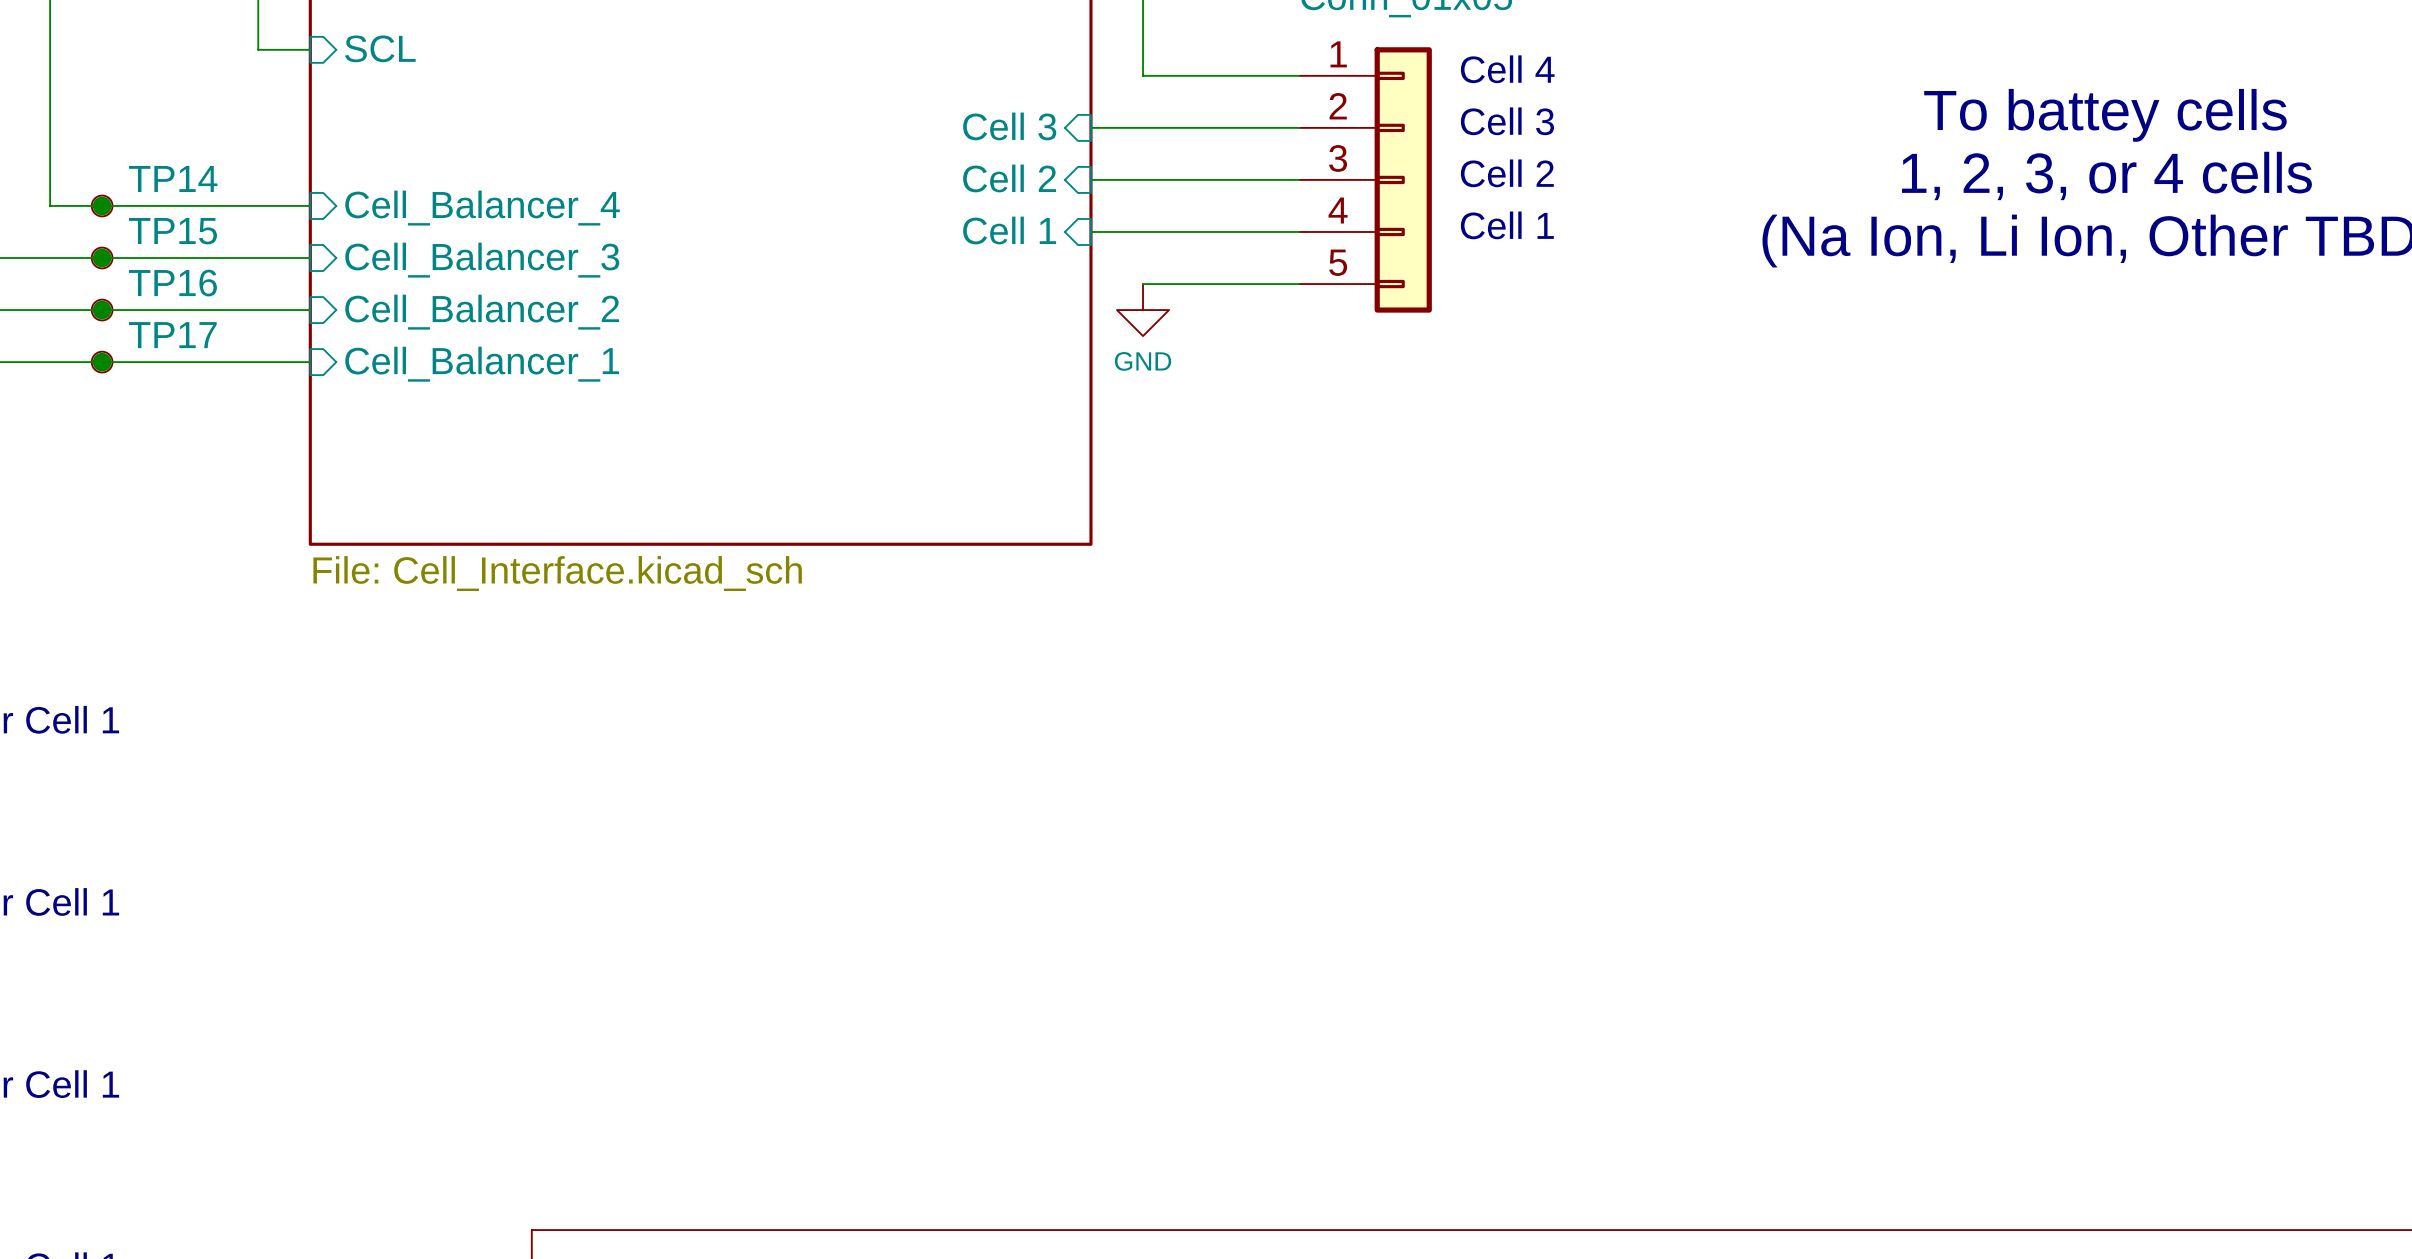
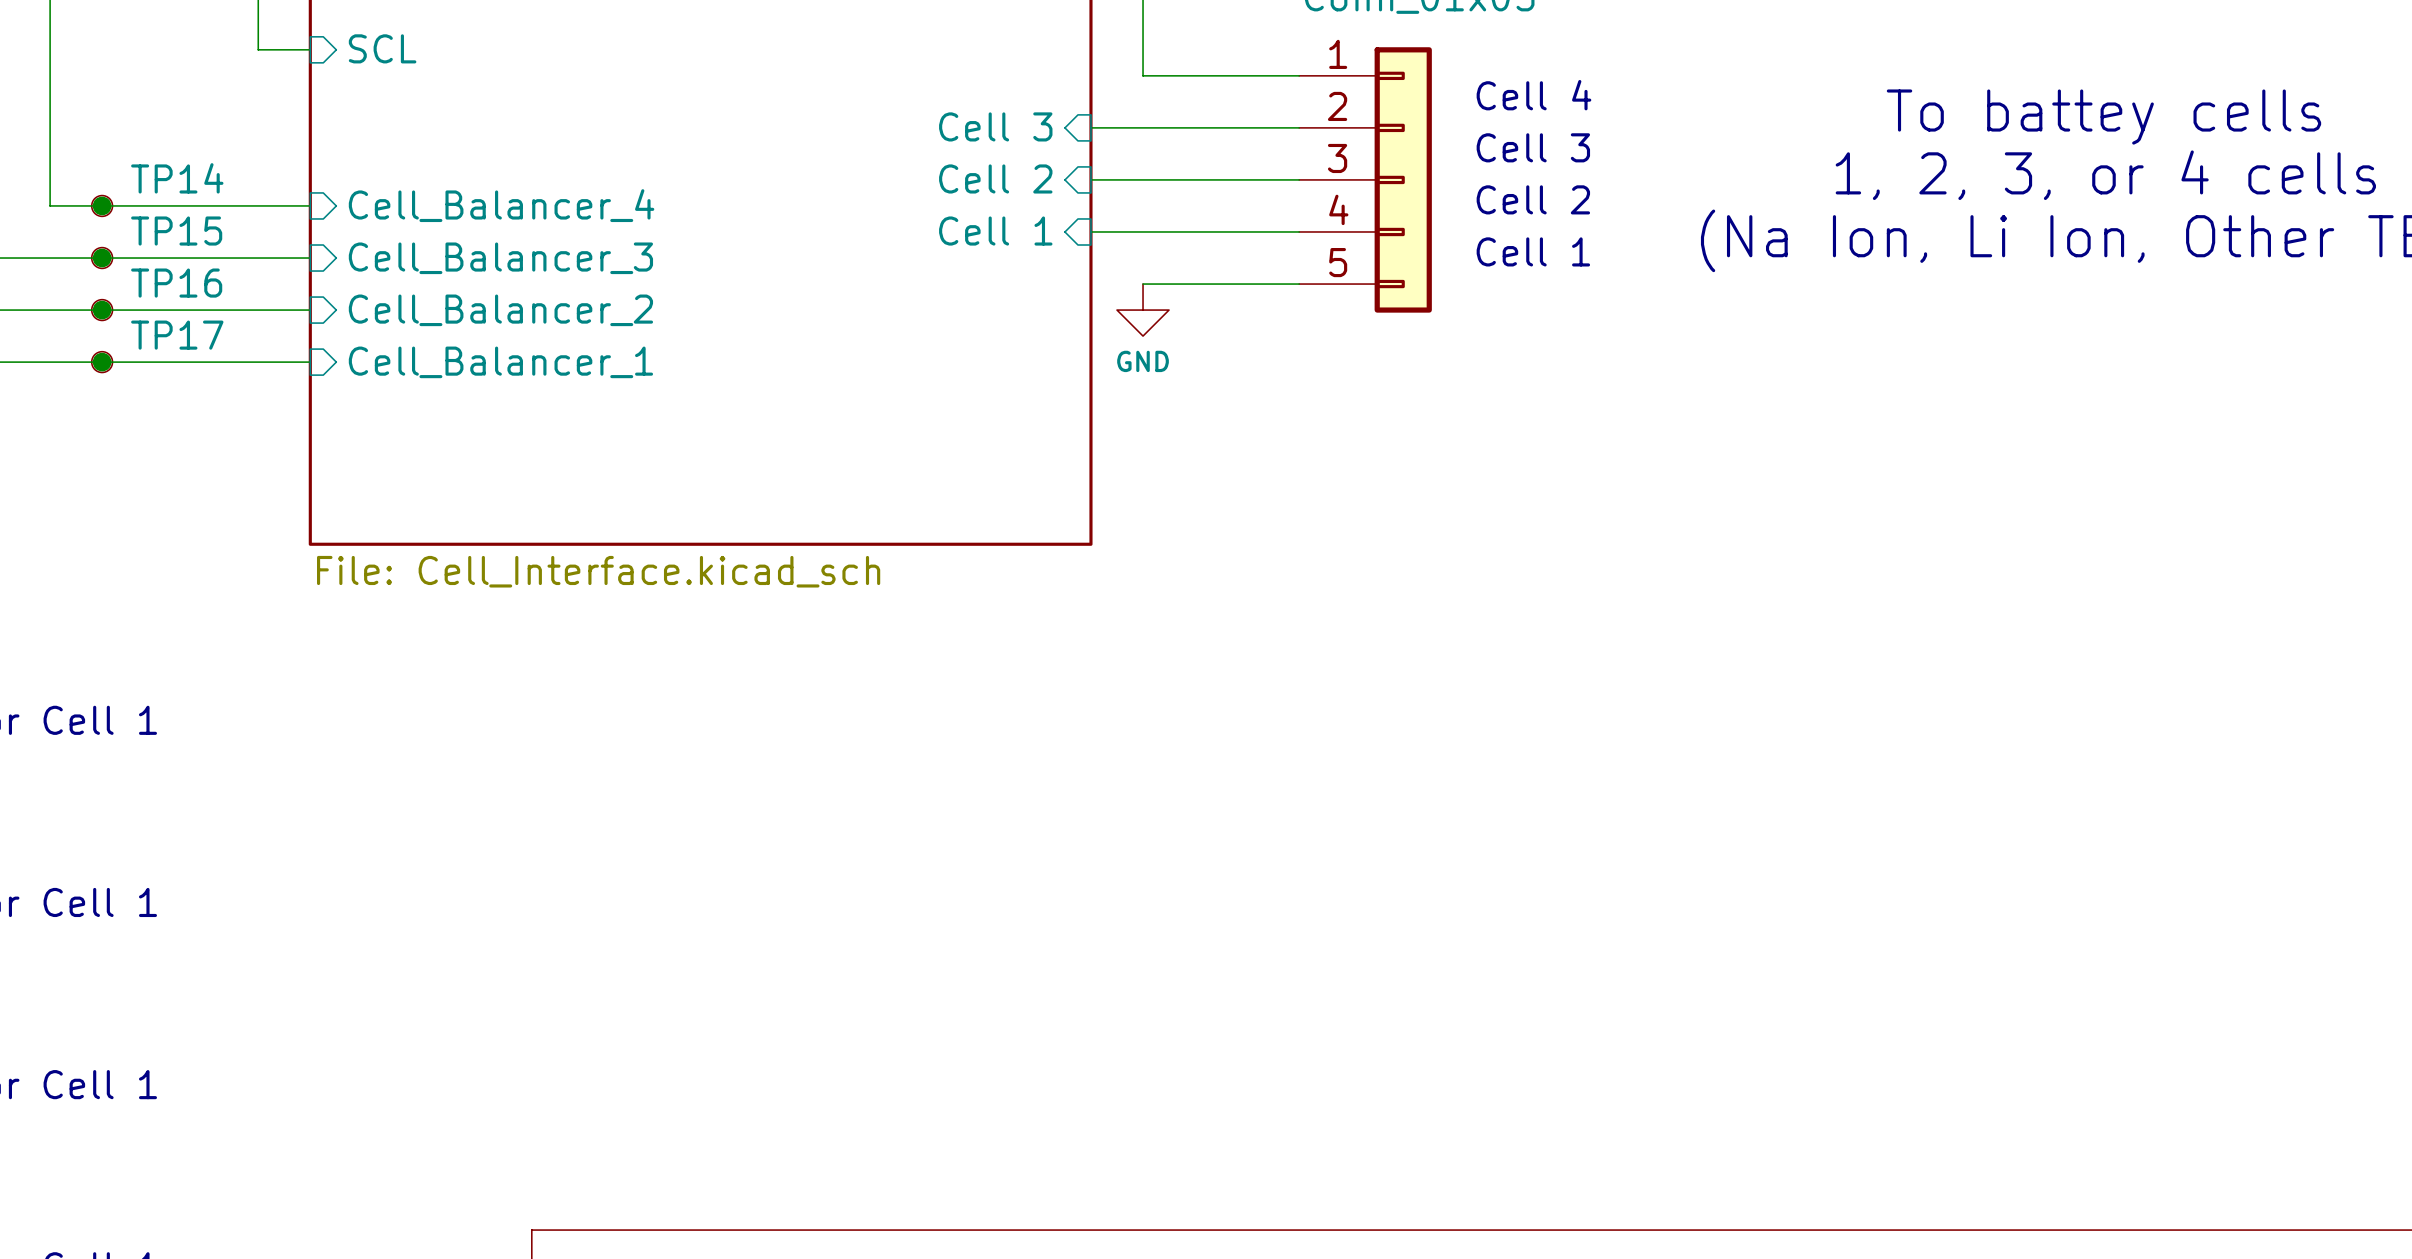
text position: Cell 4 (1507, 69) -> Cell 4 (1533, 95)
text position: Cell 3 (1507, 121) -> Cell 3 (1533, 147)
text position: Cell 2 (1507, 173) -> Cell 2 (1533, 199)
text position: Cell 1 (1507, 225) -> Cell 1 (1533, 251)

